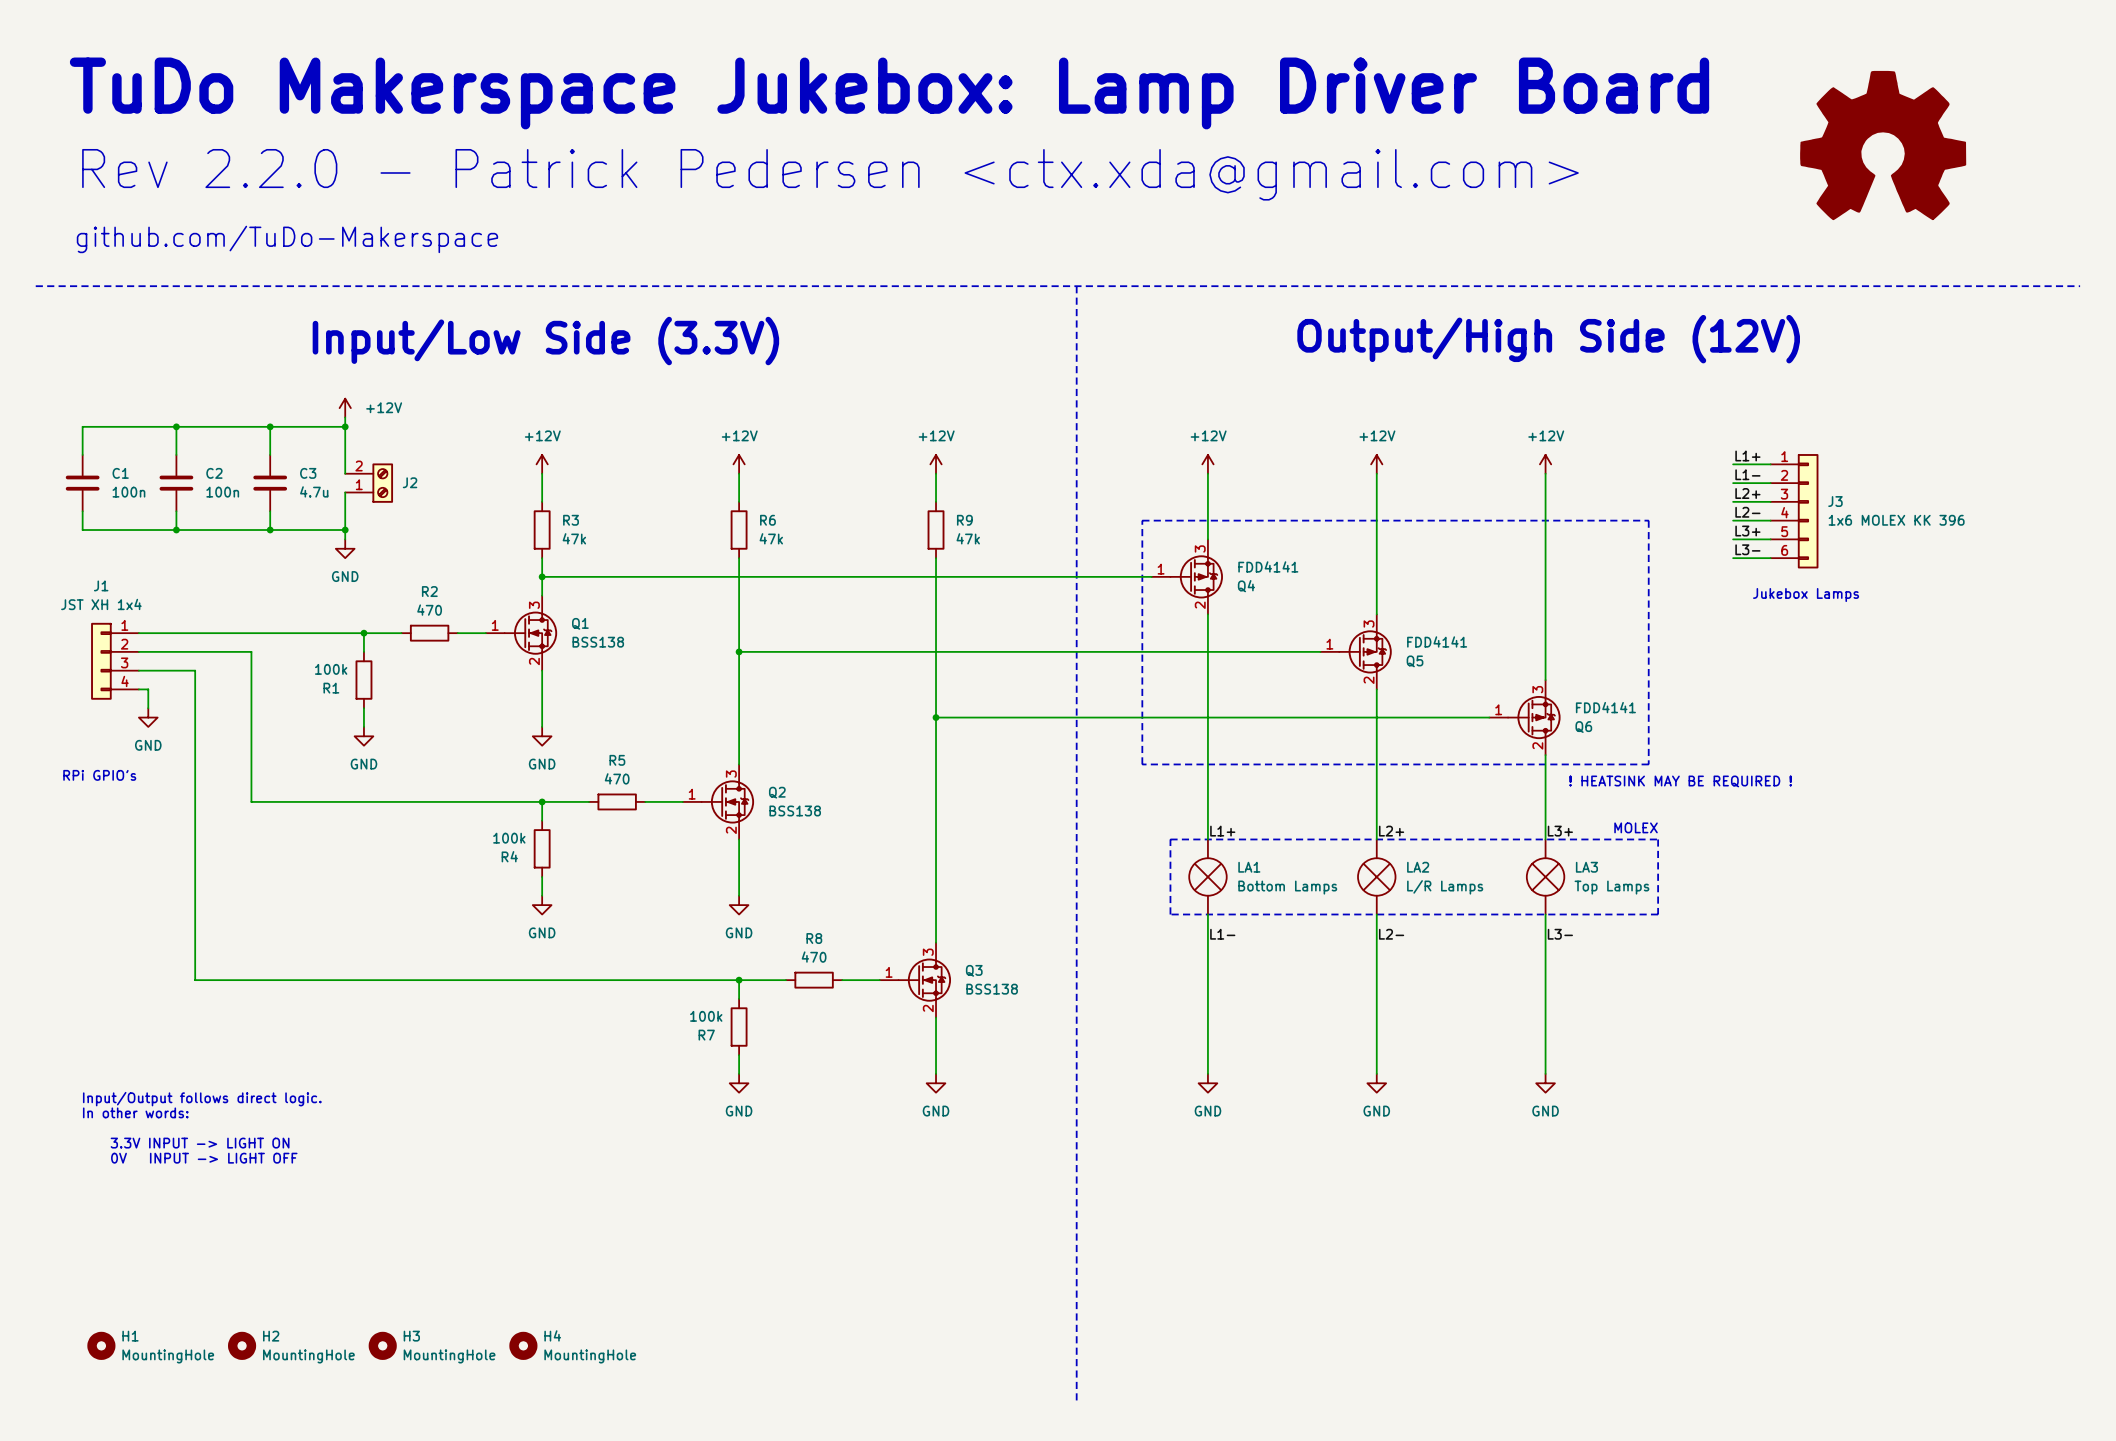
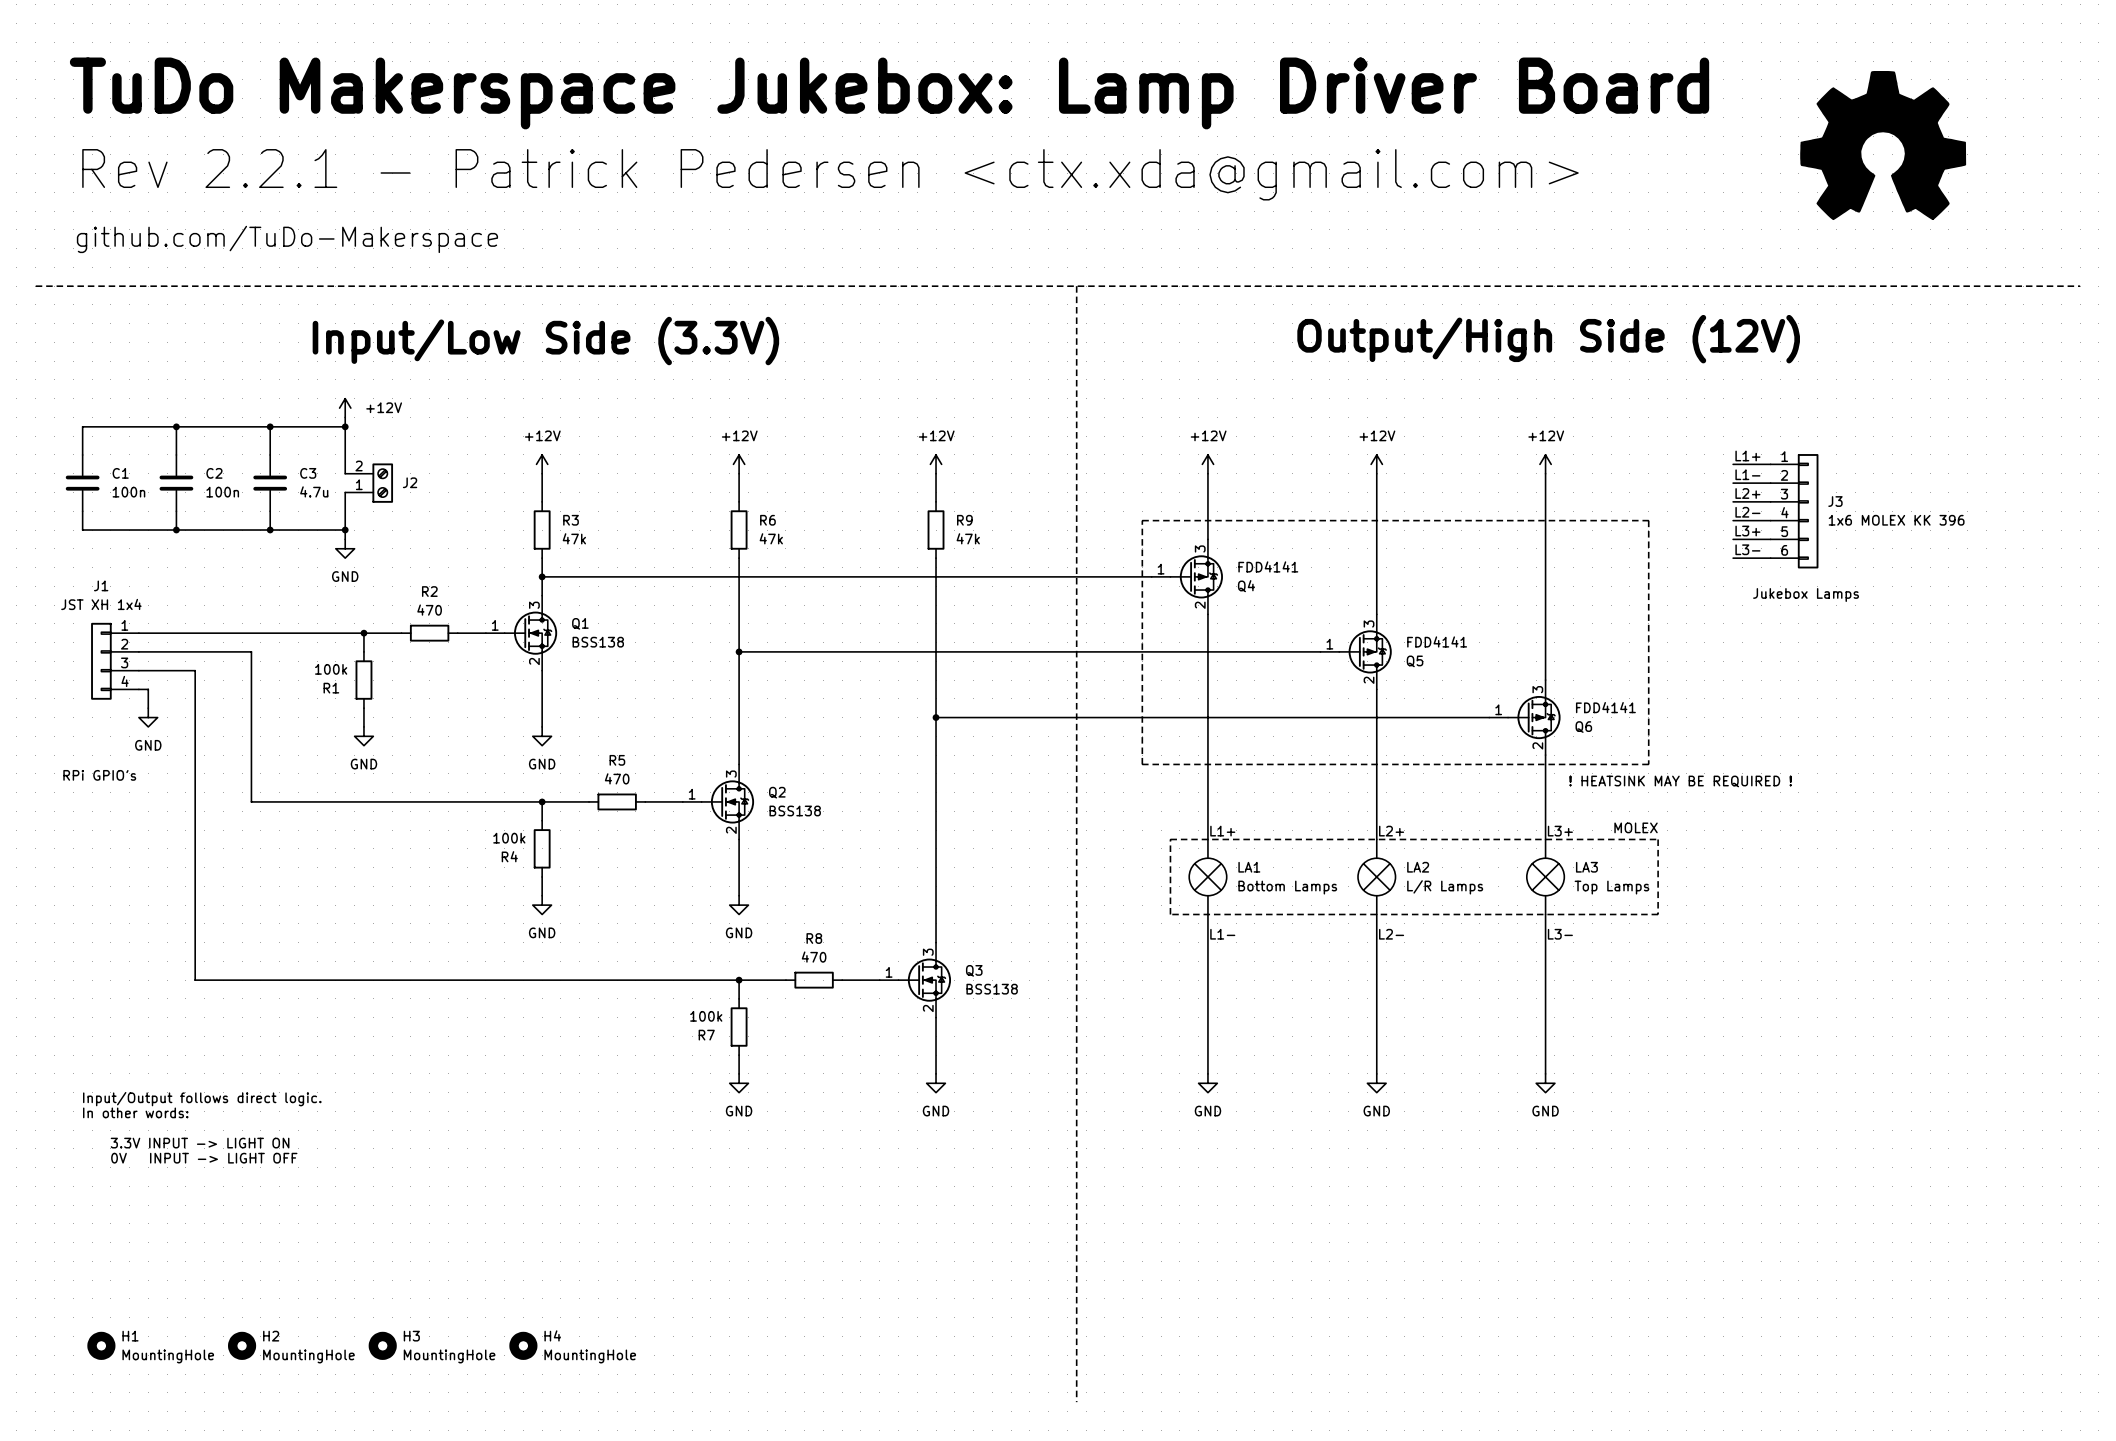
text: Rev 2.2.0 - Patrick Pedersen <ctx.xda@gmail.com> (830, 174) -> Rev 2.2.1 - Patrick Pedersen <ctx.xda@gmail.com> (830, 174)

